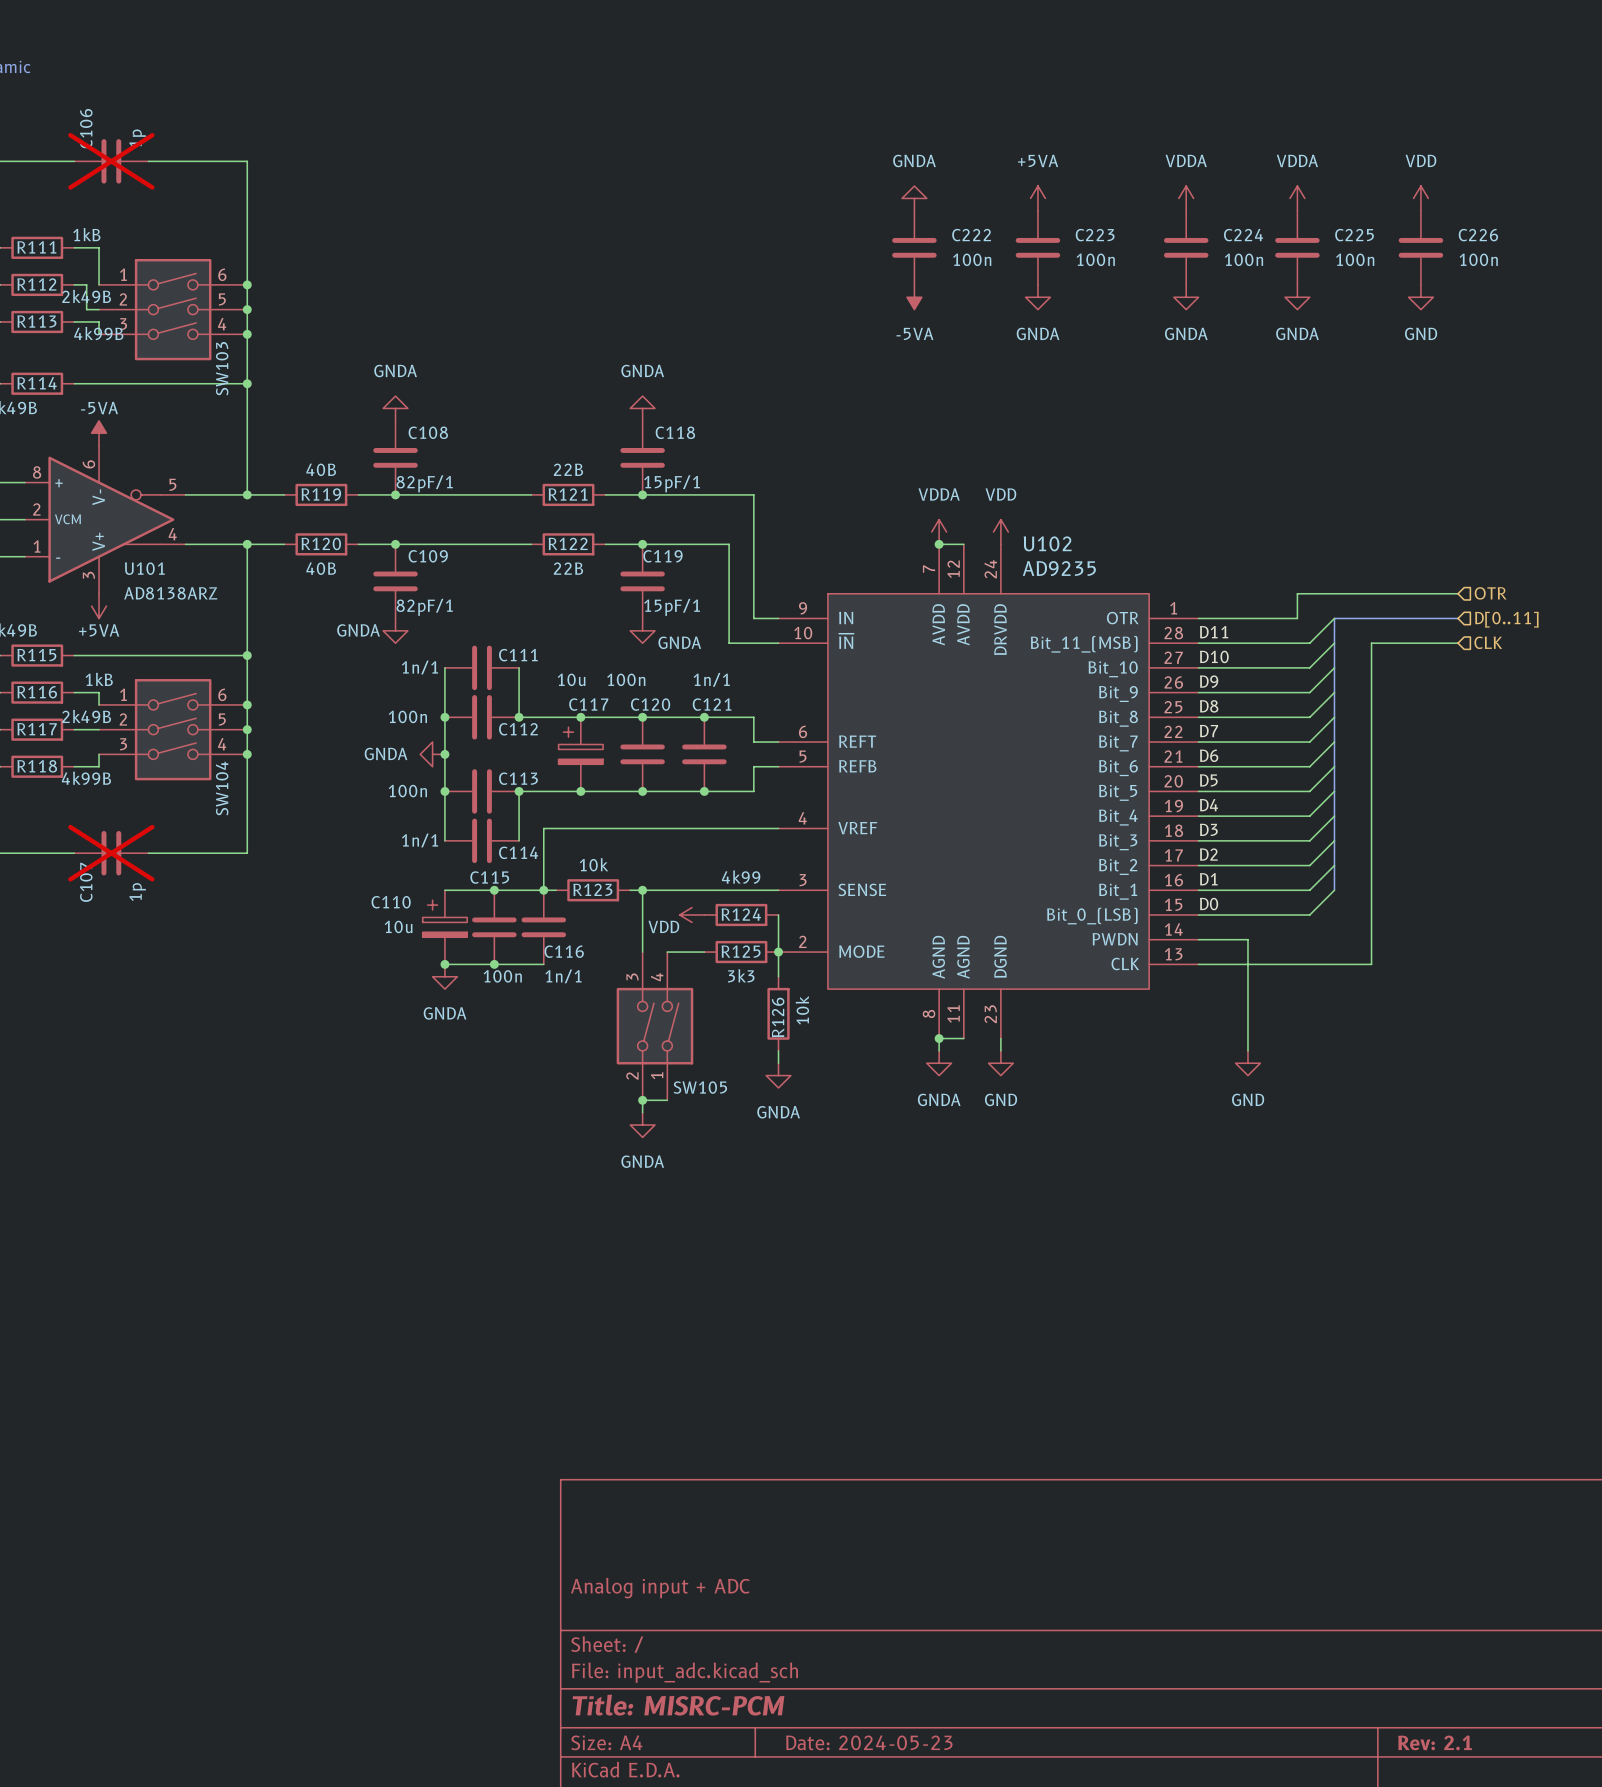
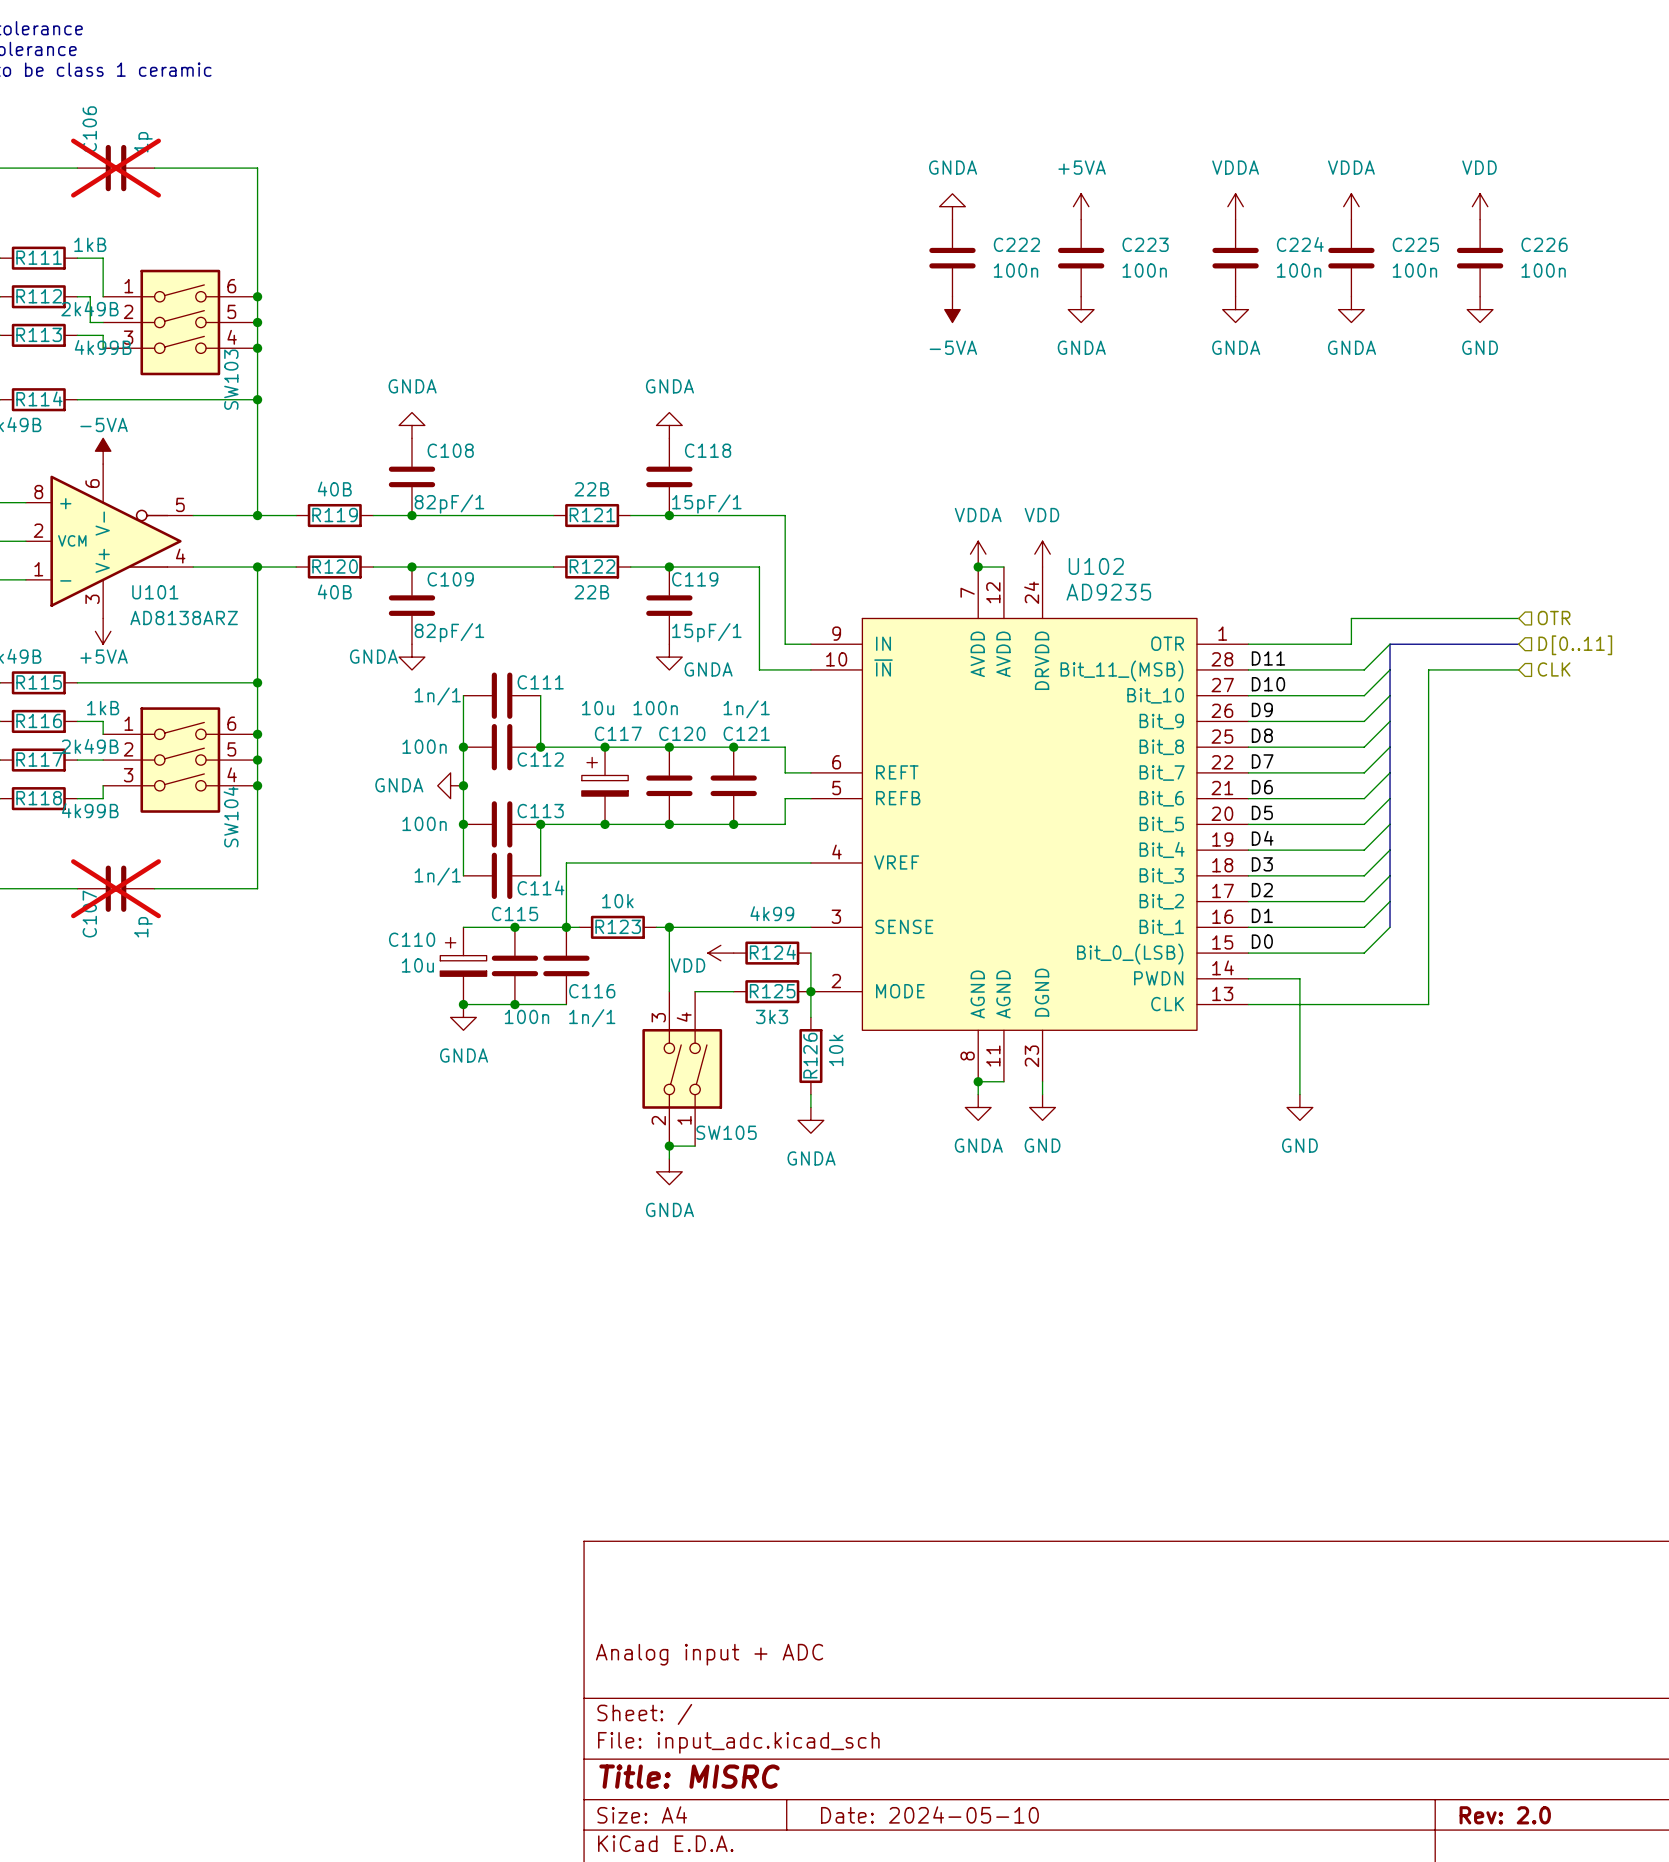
title block: Title: MISRC-PCM (678, 1705) -> Title: MISRC (689, 1776)
title block: Date: 2024-05-23 (869, 1742) -> Date: 2024-05-10 (929, 1814)
title block: Rev: 2.1 (1435, 1742) -> Rev: 2.0 (1505, 1815)

